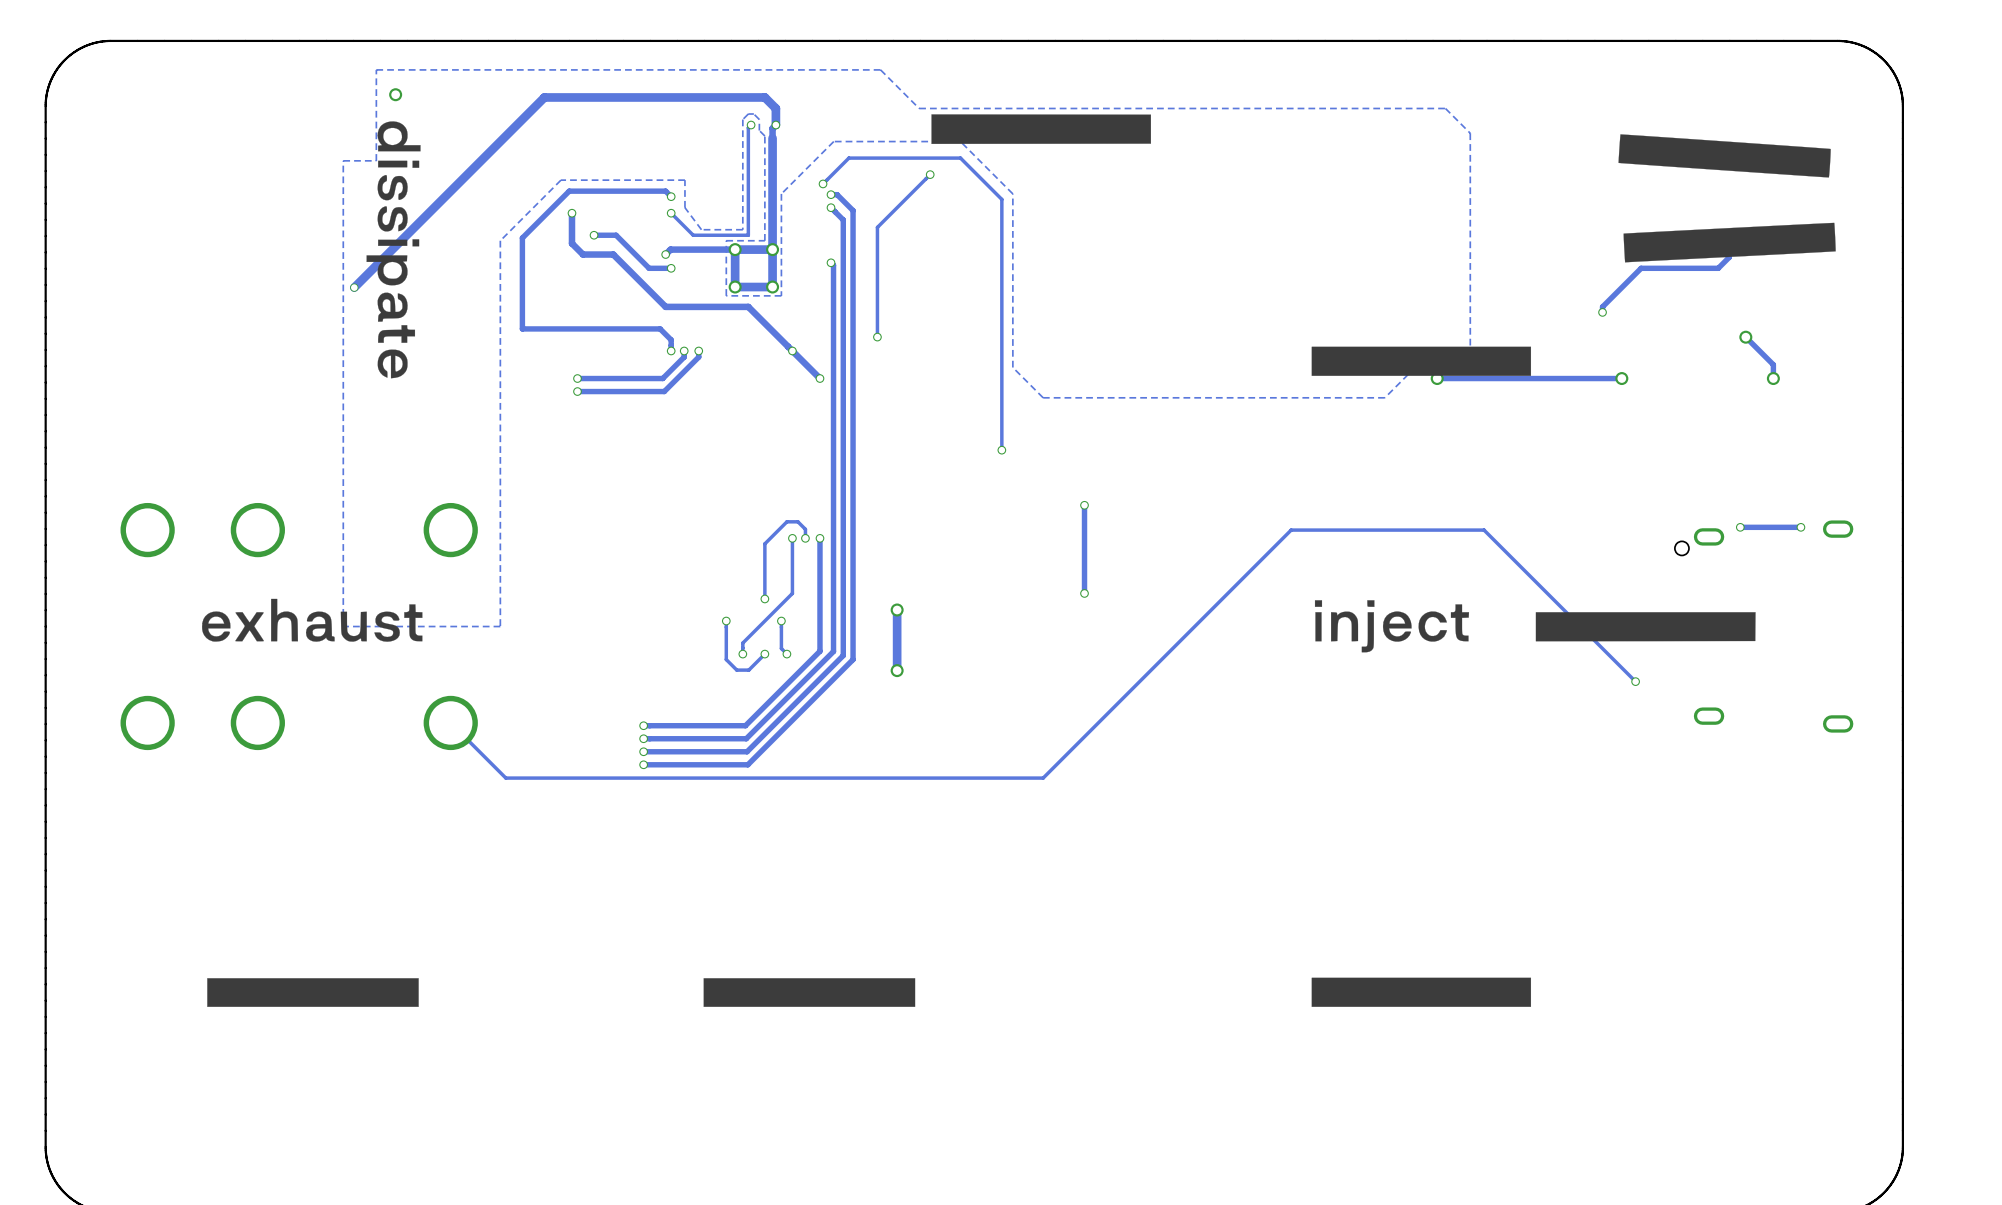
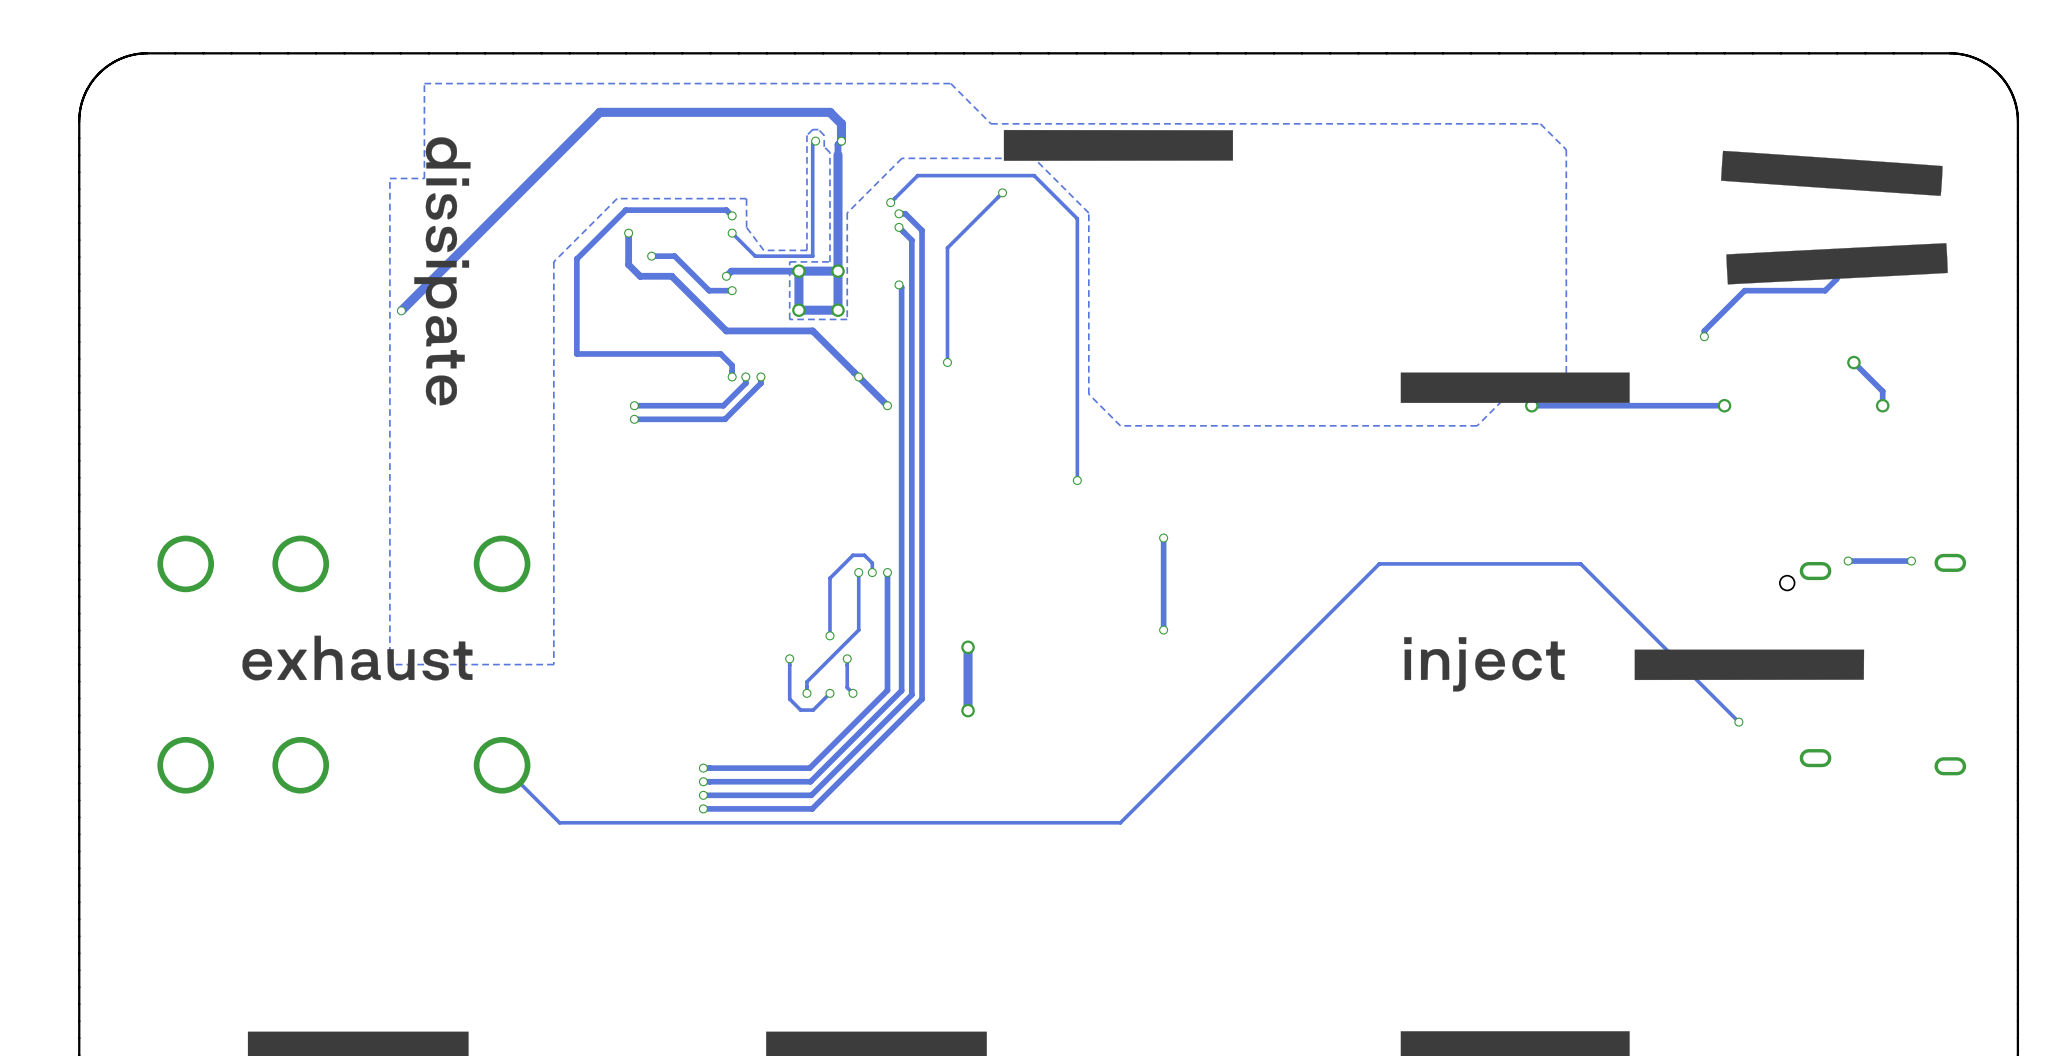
via: (395, 94) -> none

